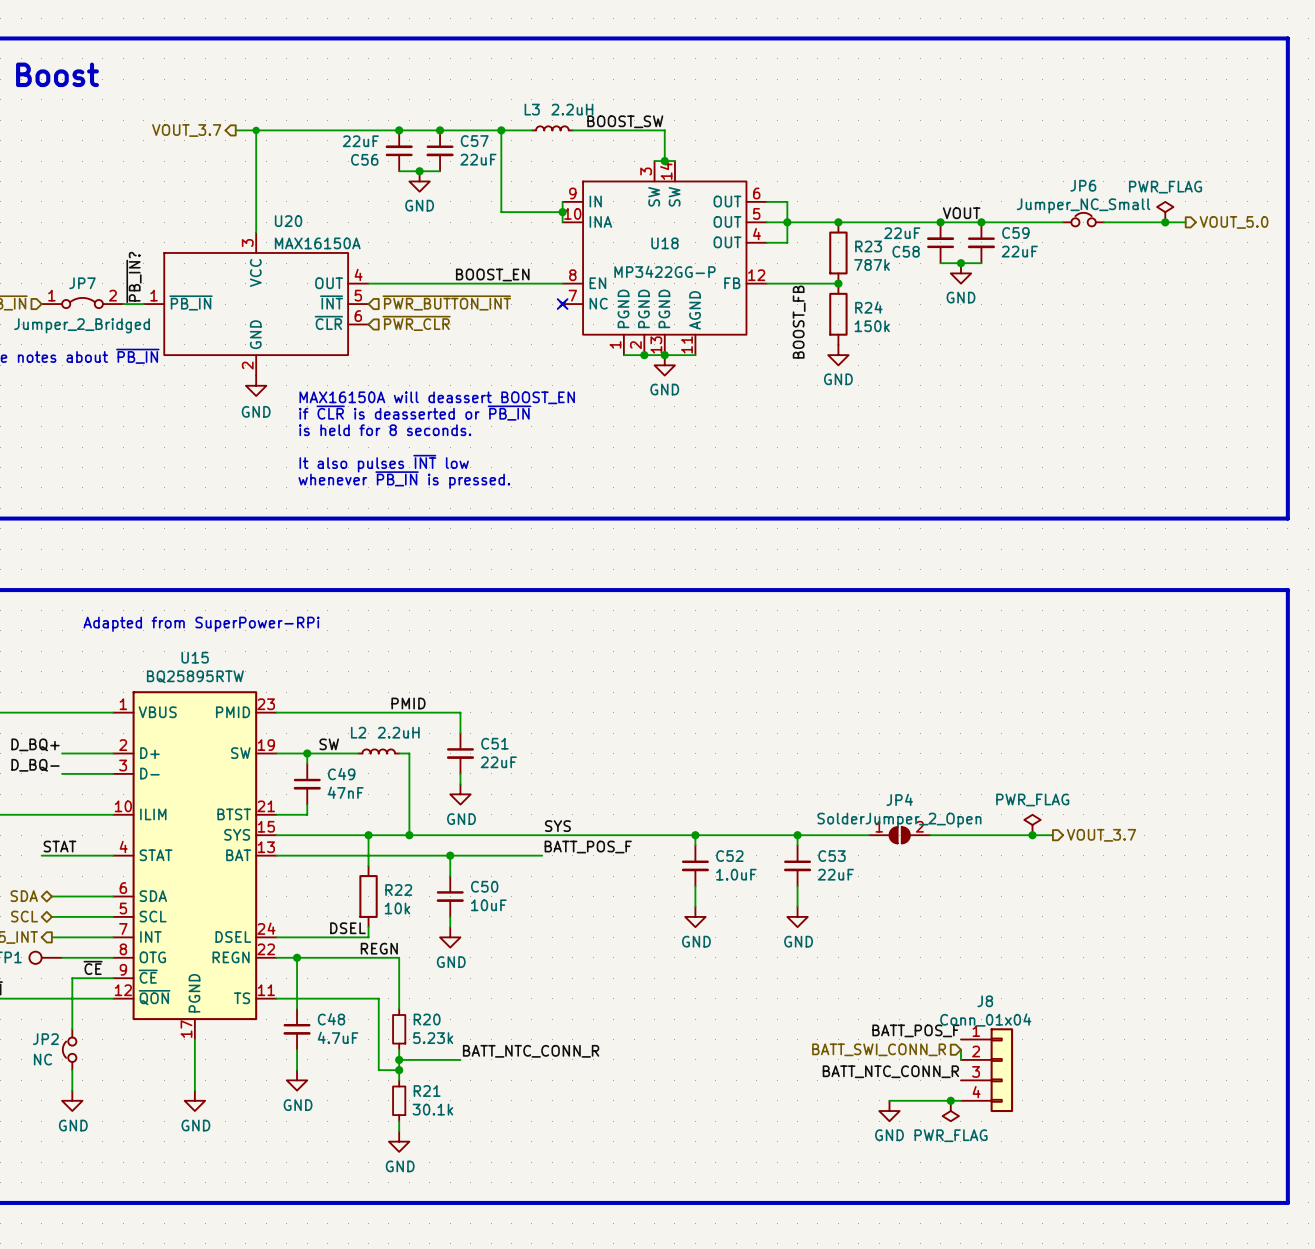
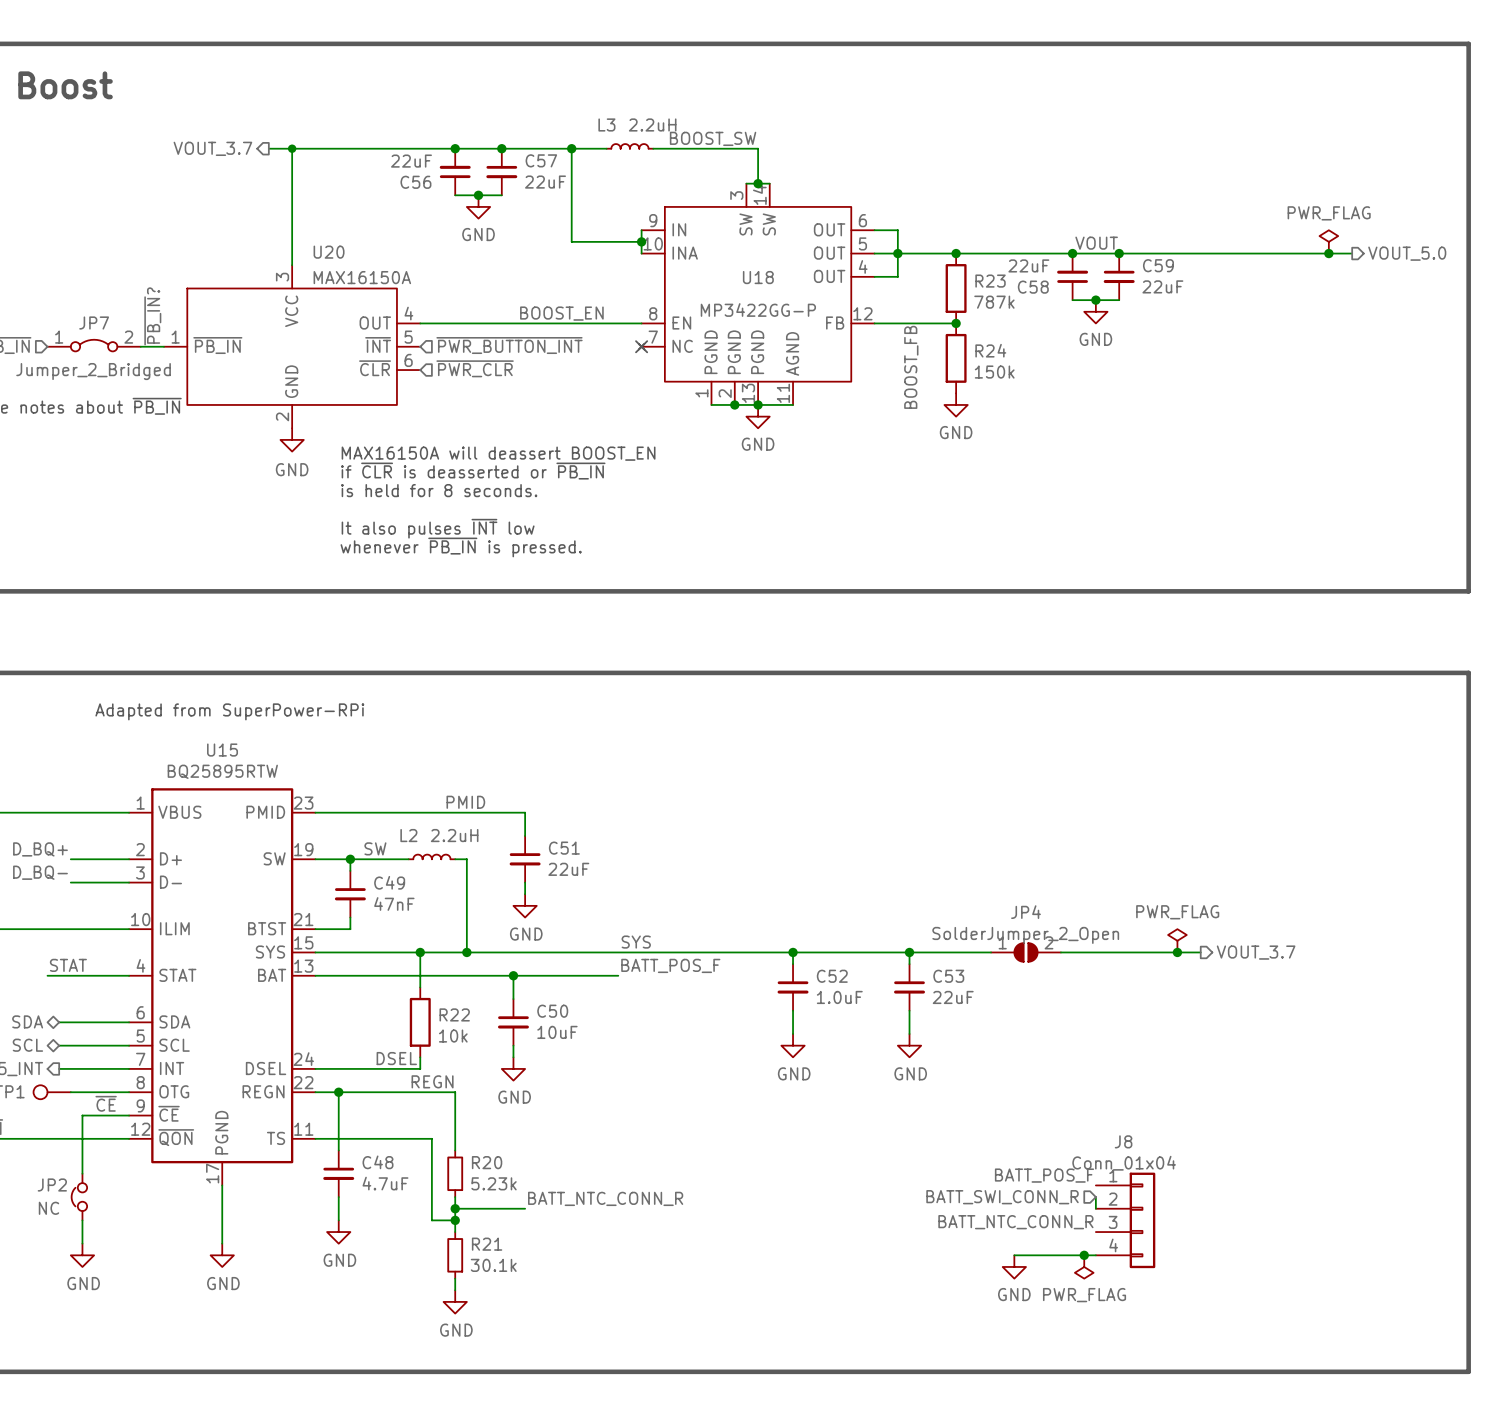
JP6: Jumper_NC_Small (1083, 219) -> none

